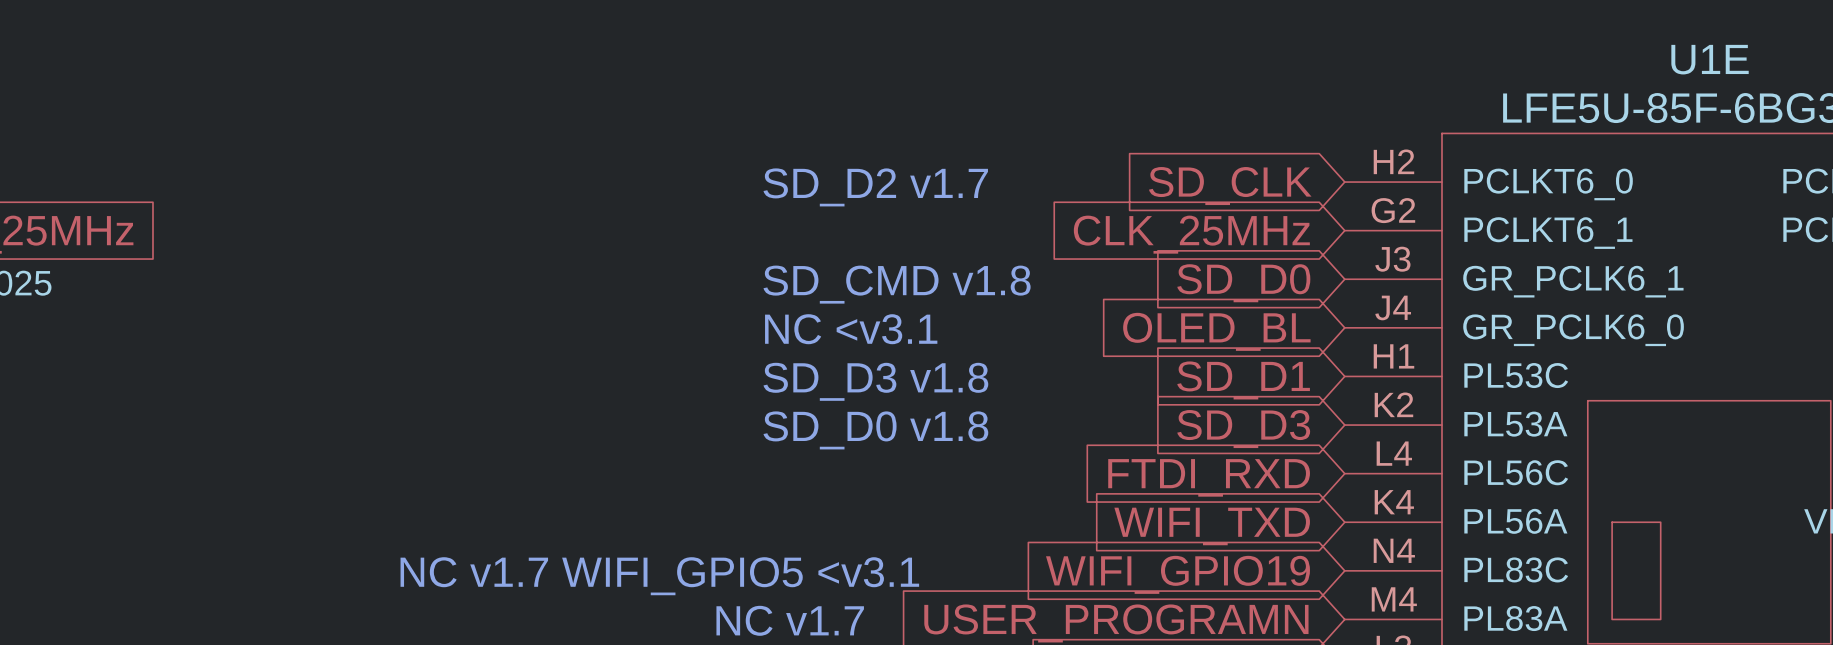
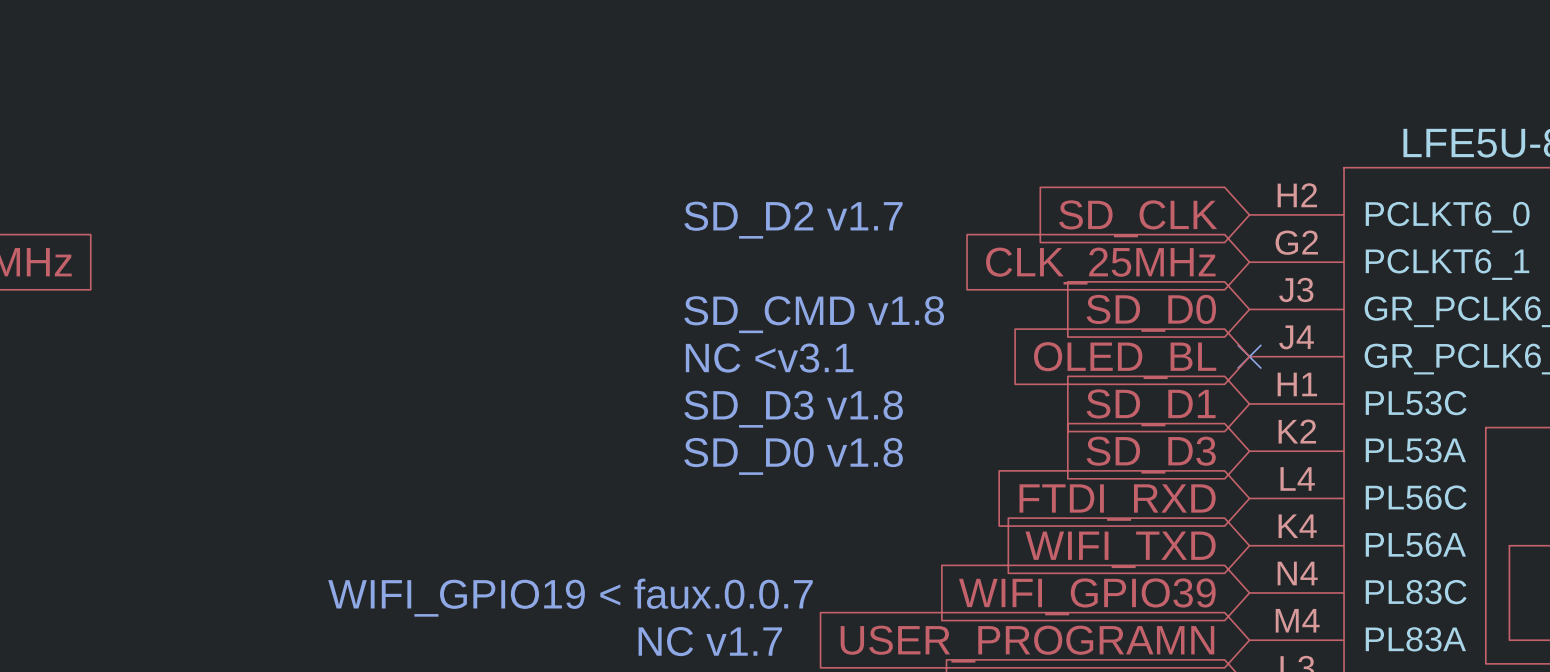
no-connect mark: none -> (1249, 356)
global label: WIFI_GPIO19 (1177, 574) -> WIFI_GPIO39 (1087, 596)
text: NC v1.7 WIFI_GPIO5 <v3.1 (659, 576) -> WIFI_GPIO19 < faux.0.0.7 (570, 597)

